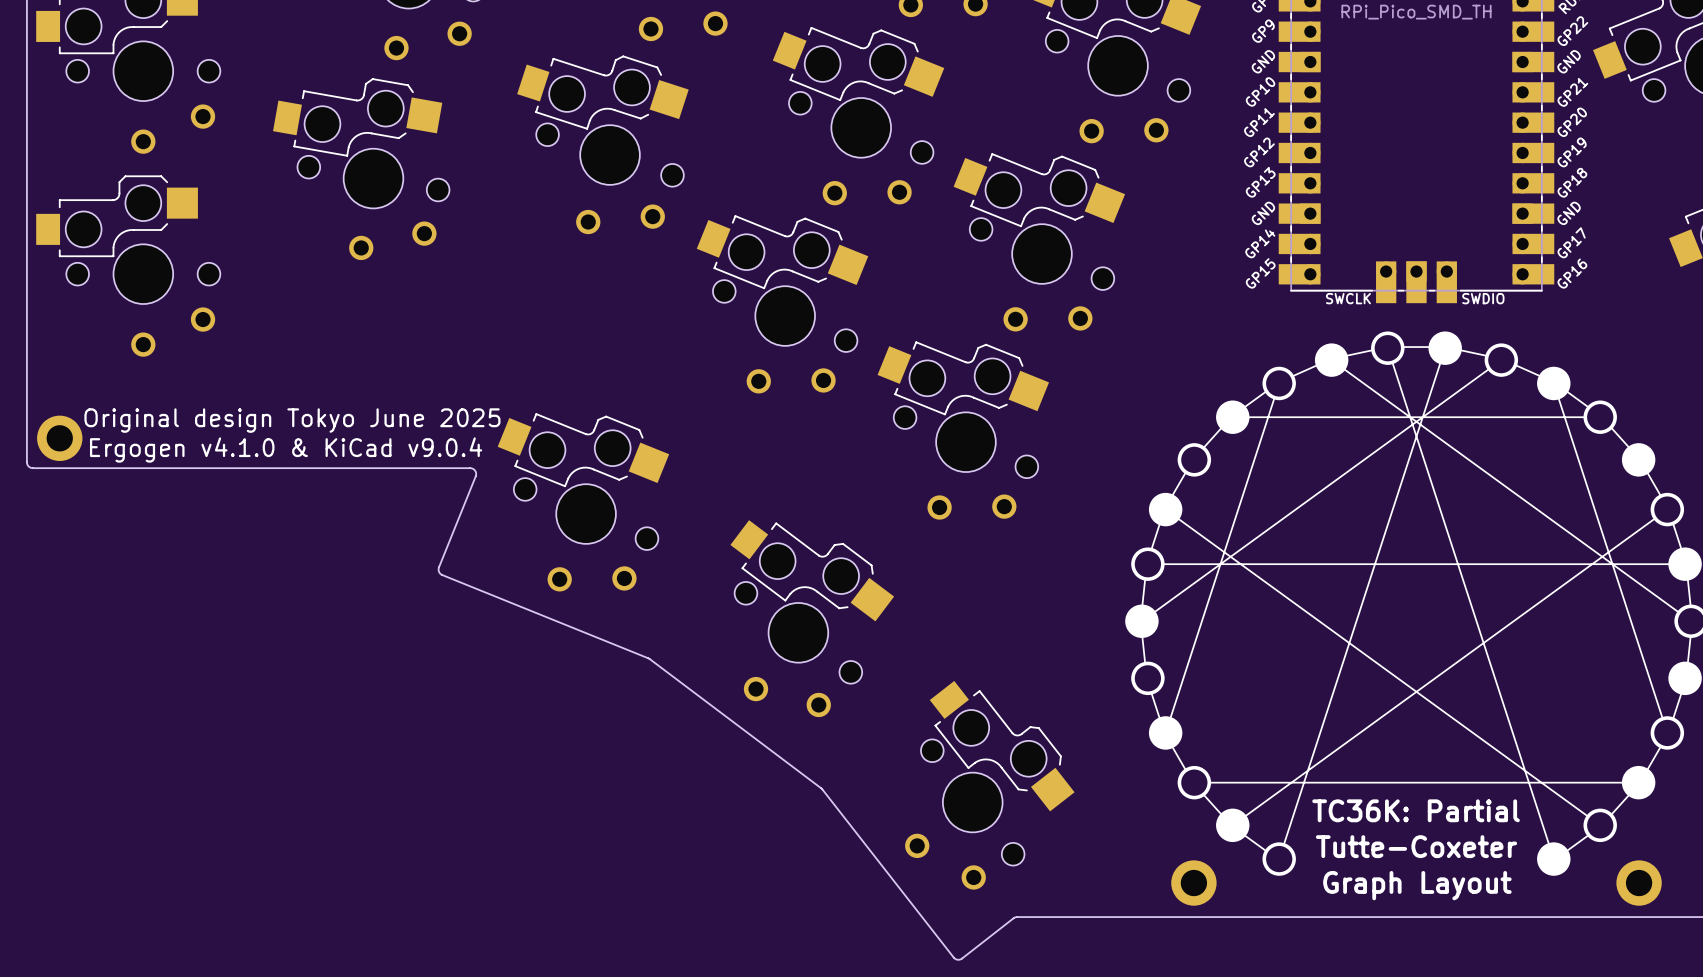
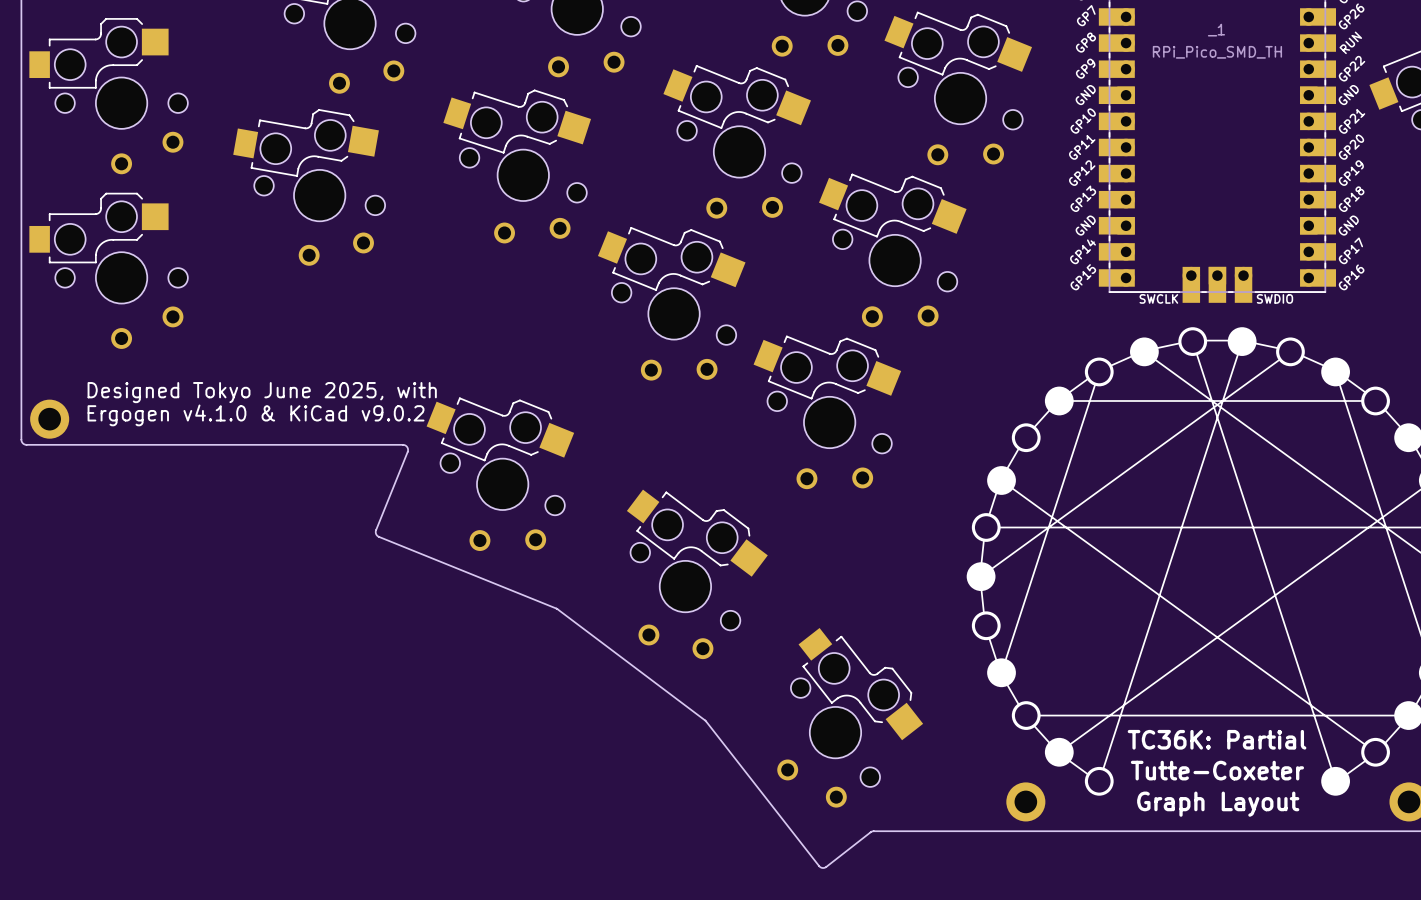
text: Original design Tokyo June 2025 (292, 420) -> Designed Tokyo June 2025, with (262, 392)
text: Ergogen v4.1.0 & KiCad v9.0.4 (286, 449) -> Ergogen v4.1.0 & KiCad v9.0.2 (256, 415)

